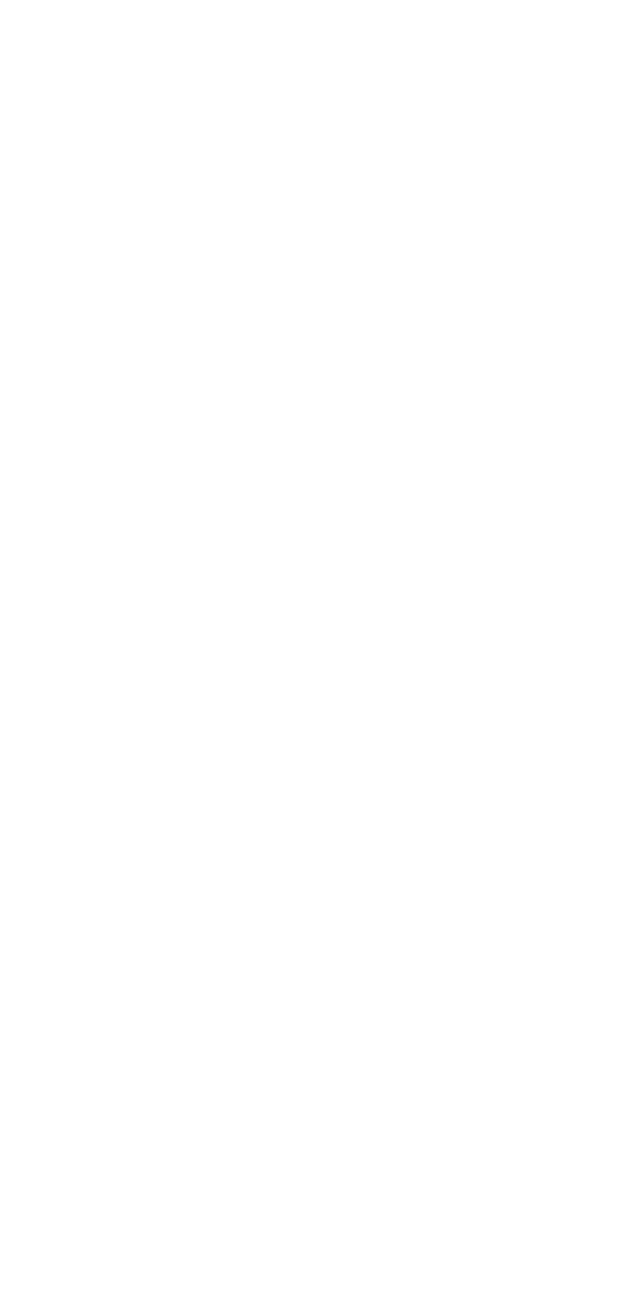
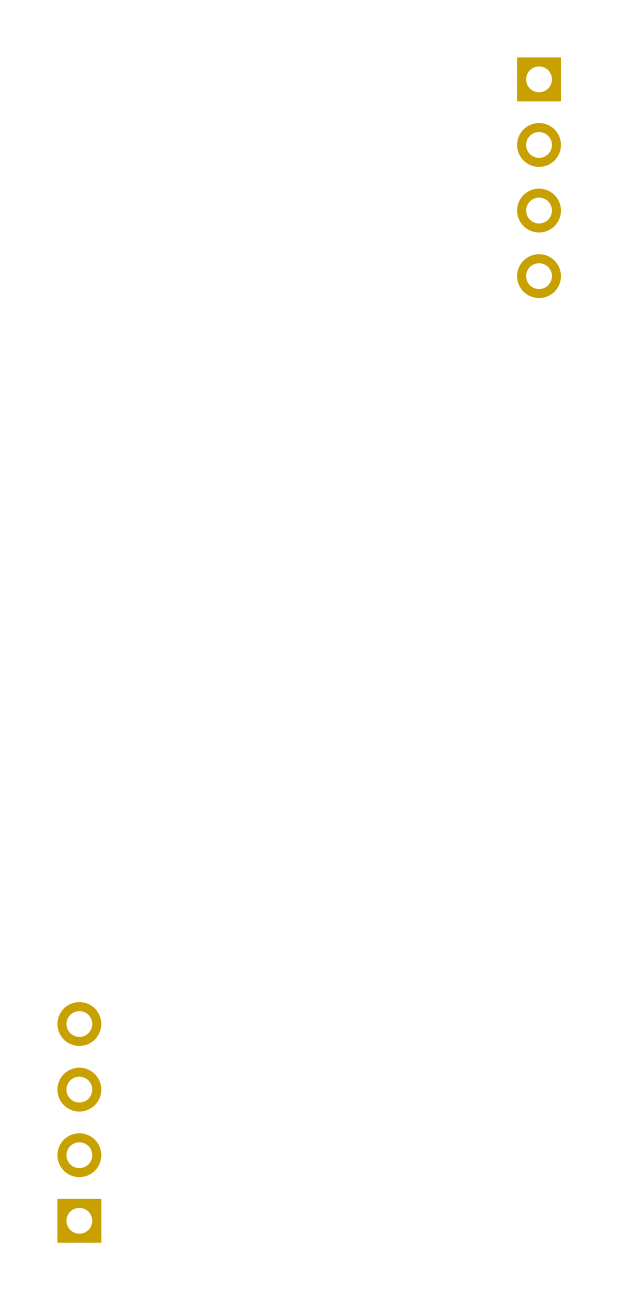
part: none -> (539, 177)
part: none -> (79, 1122)

